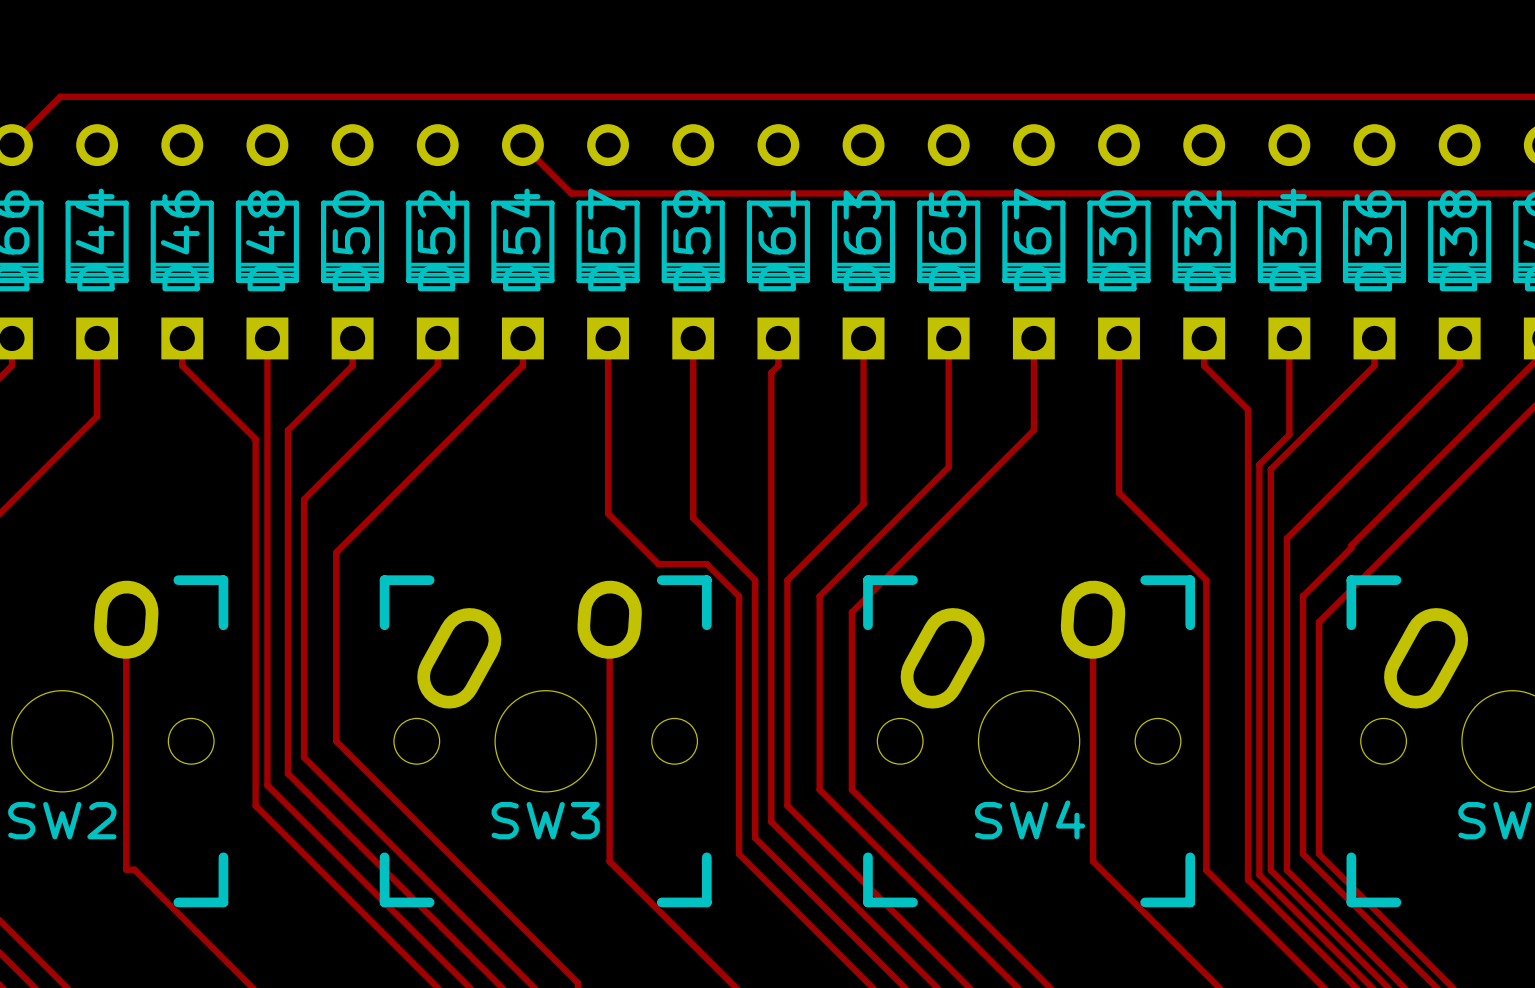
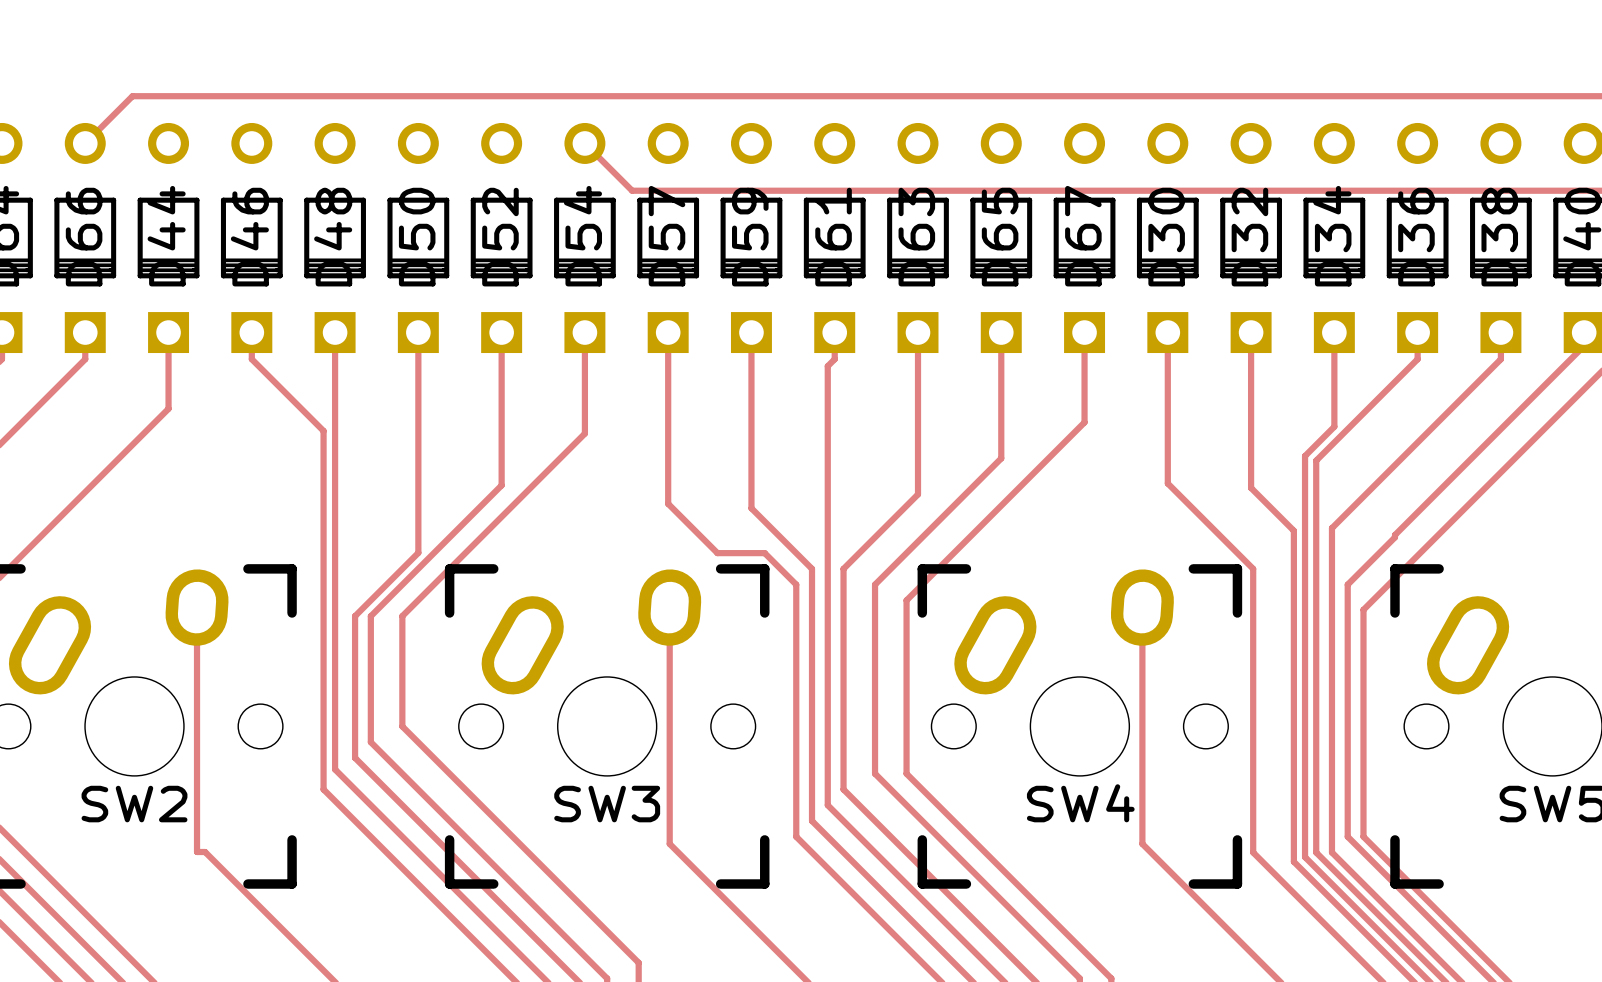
track: (352, 365) (287, 430) (287, 628) -> (418, 359) (418, 552) (355, 616)
track: (437, 365) (304, 499) (304, 628) -> (501, 359) (501, 485) (370, 616)
track: (522, 365) (336, 552) (336, 628) -> (584, 359) (584, 433) (402, 616)
track: (1204, 365) (1247, 409) (1247, 541) -> (1251, 359) (1251, 488) (1293, 530)

